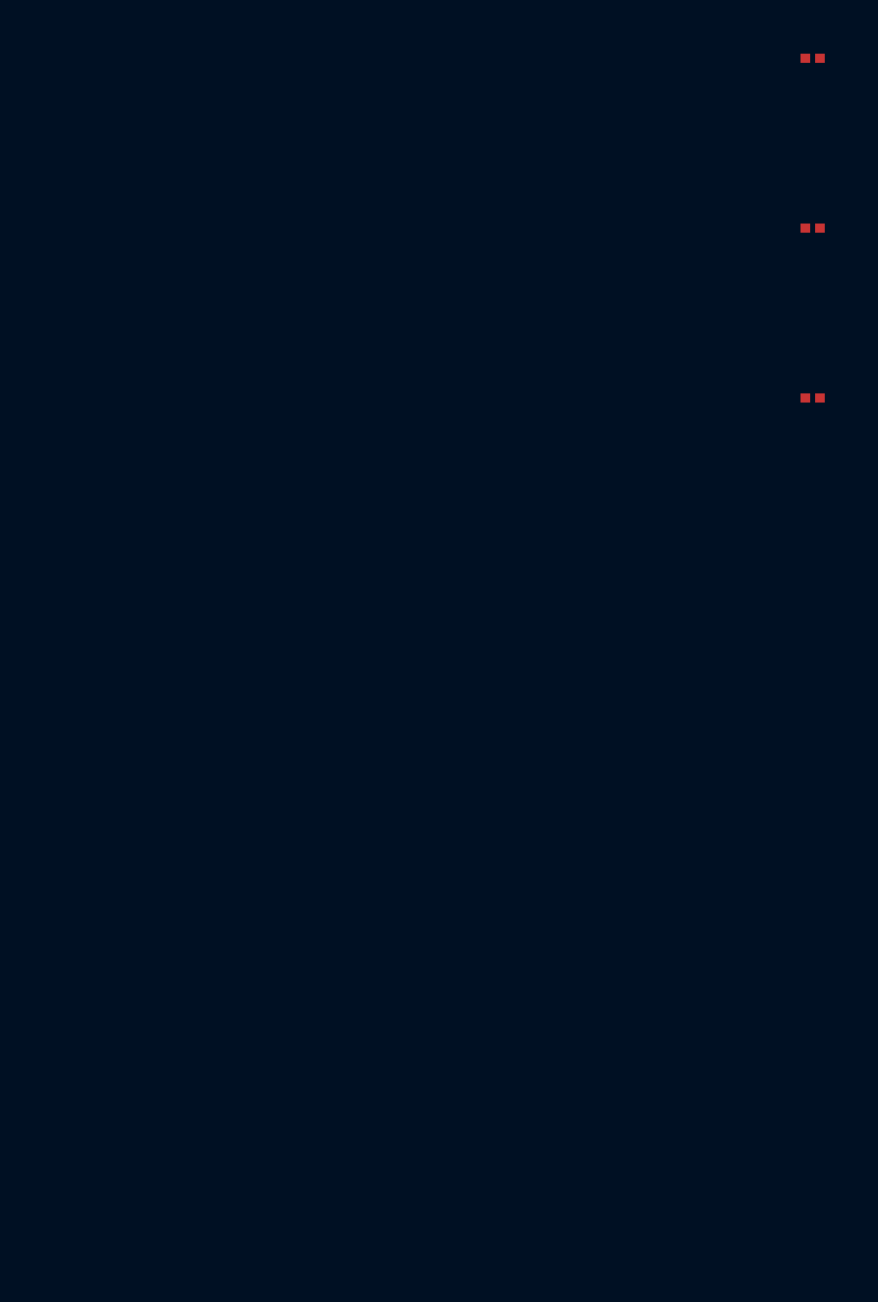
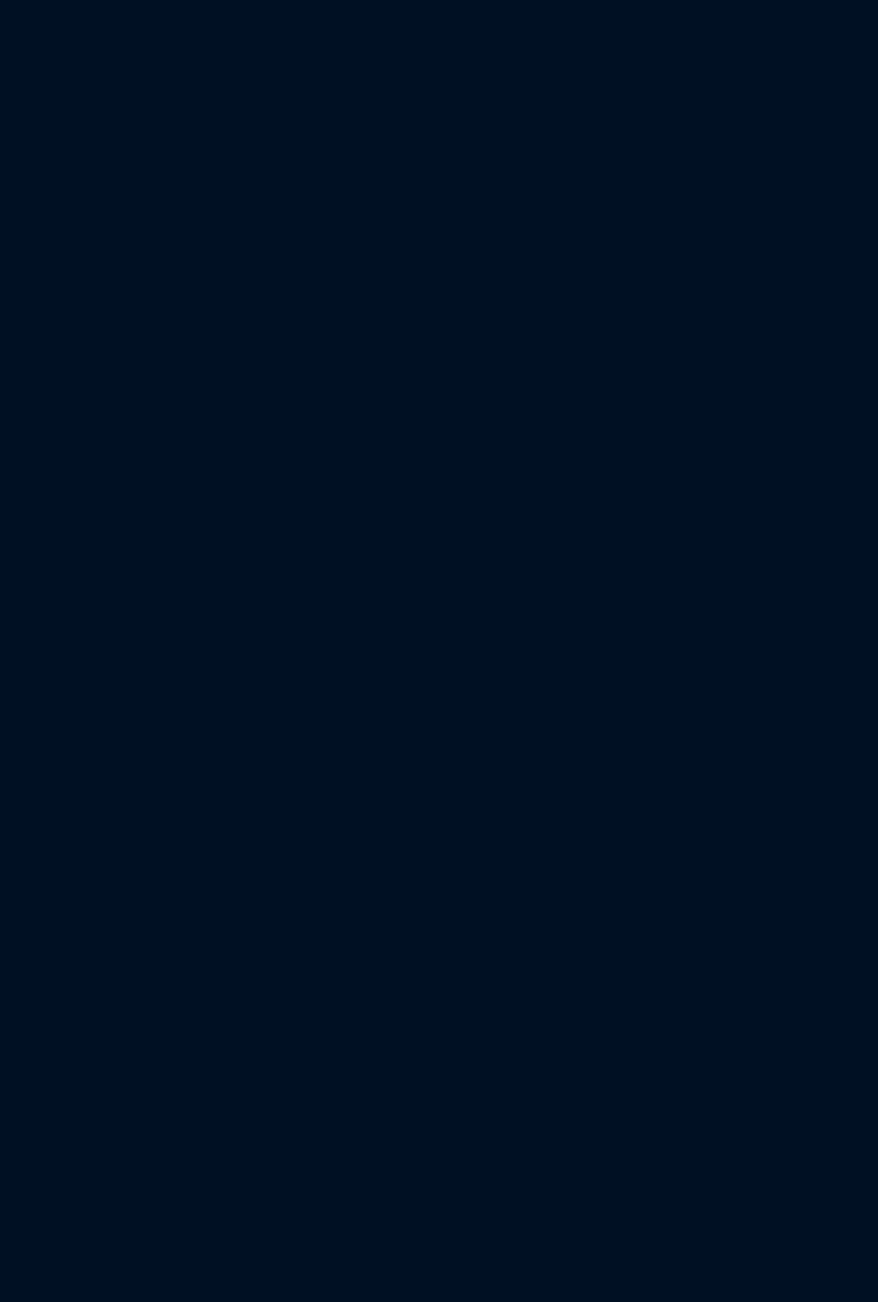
part: (812, 58) -> none
part: (812, 228) -> none
part: (812, 397) -> none

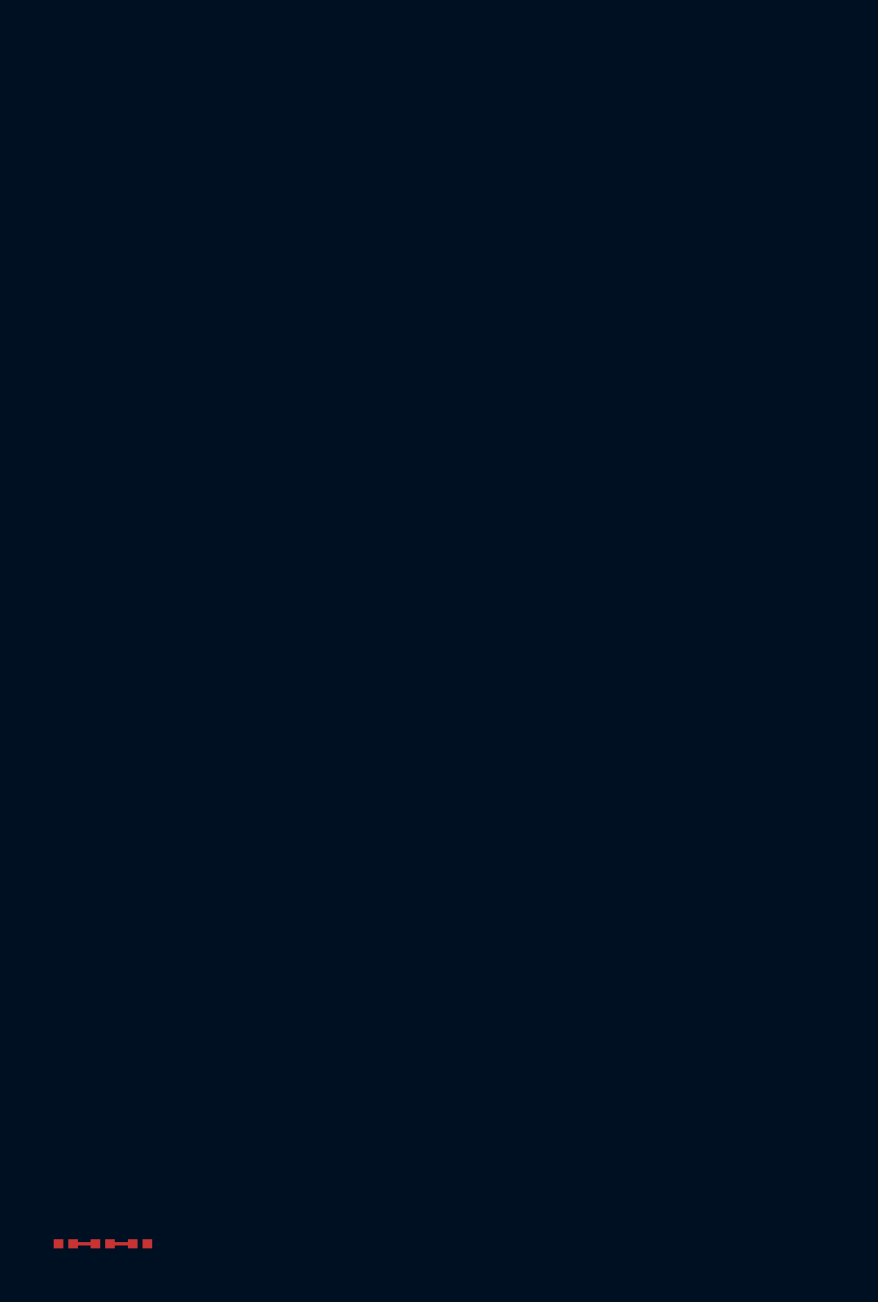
part: none -> (65, 1243)
top track: none -> (95, 1243) (73, 1243)
part: none -> (102, 1243)
top track: none -> (132, 1243) (109, 1243)
part: none -> (140, 1243)

